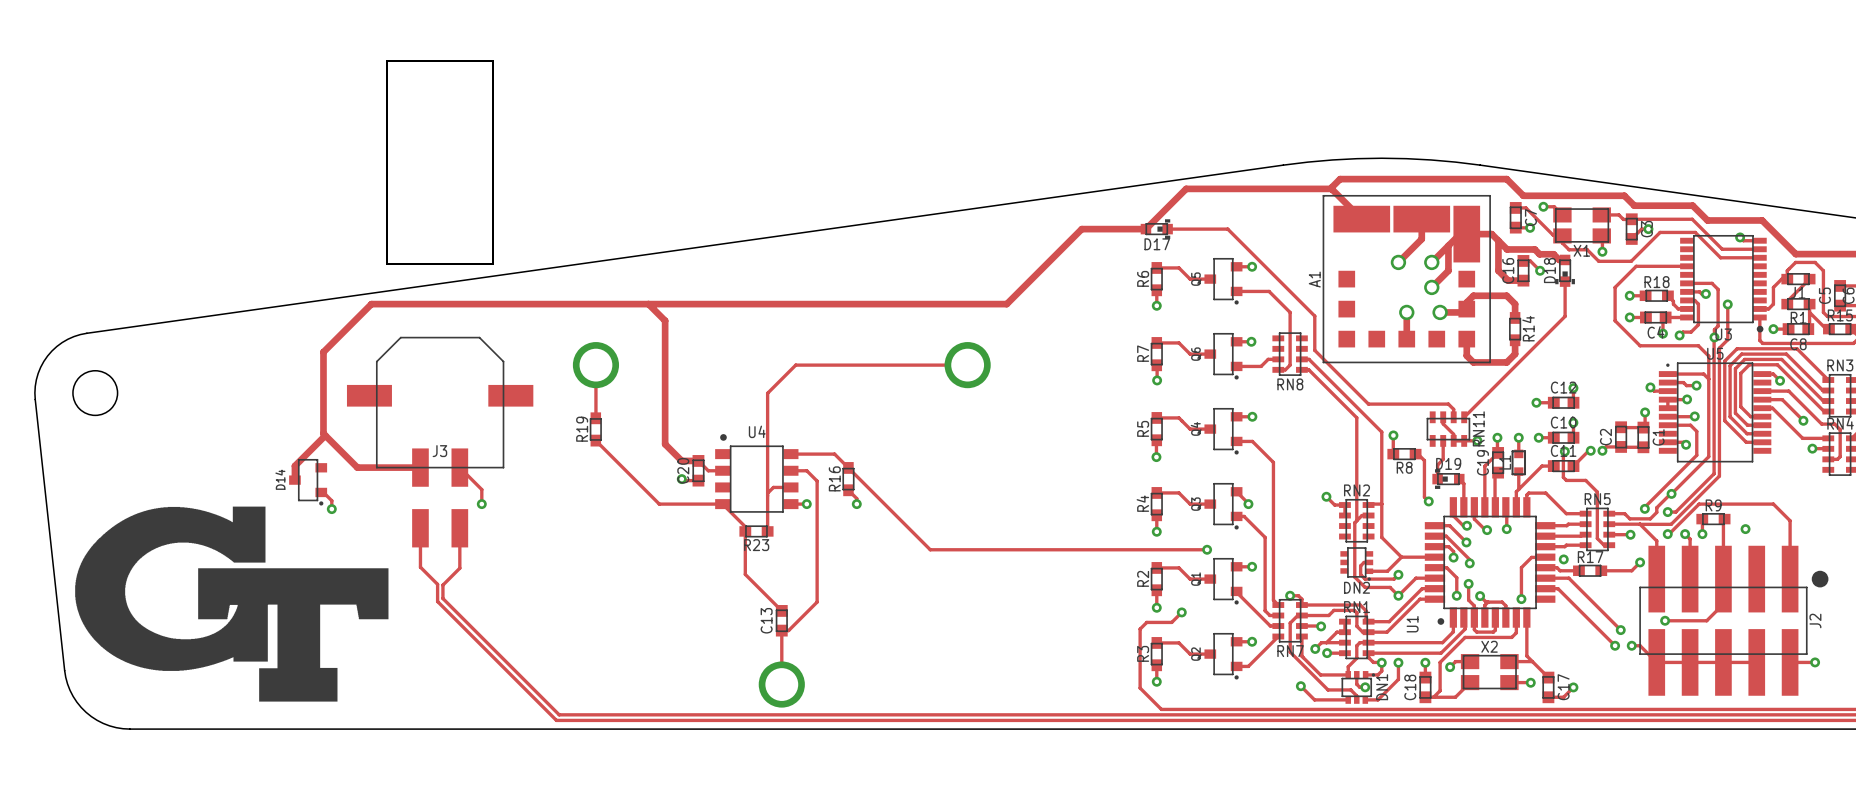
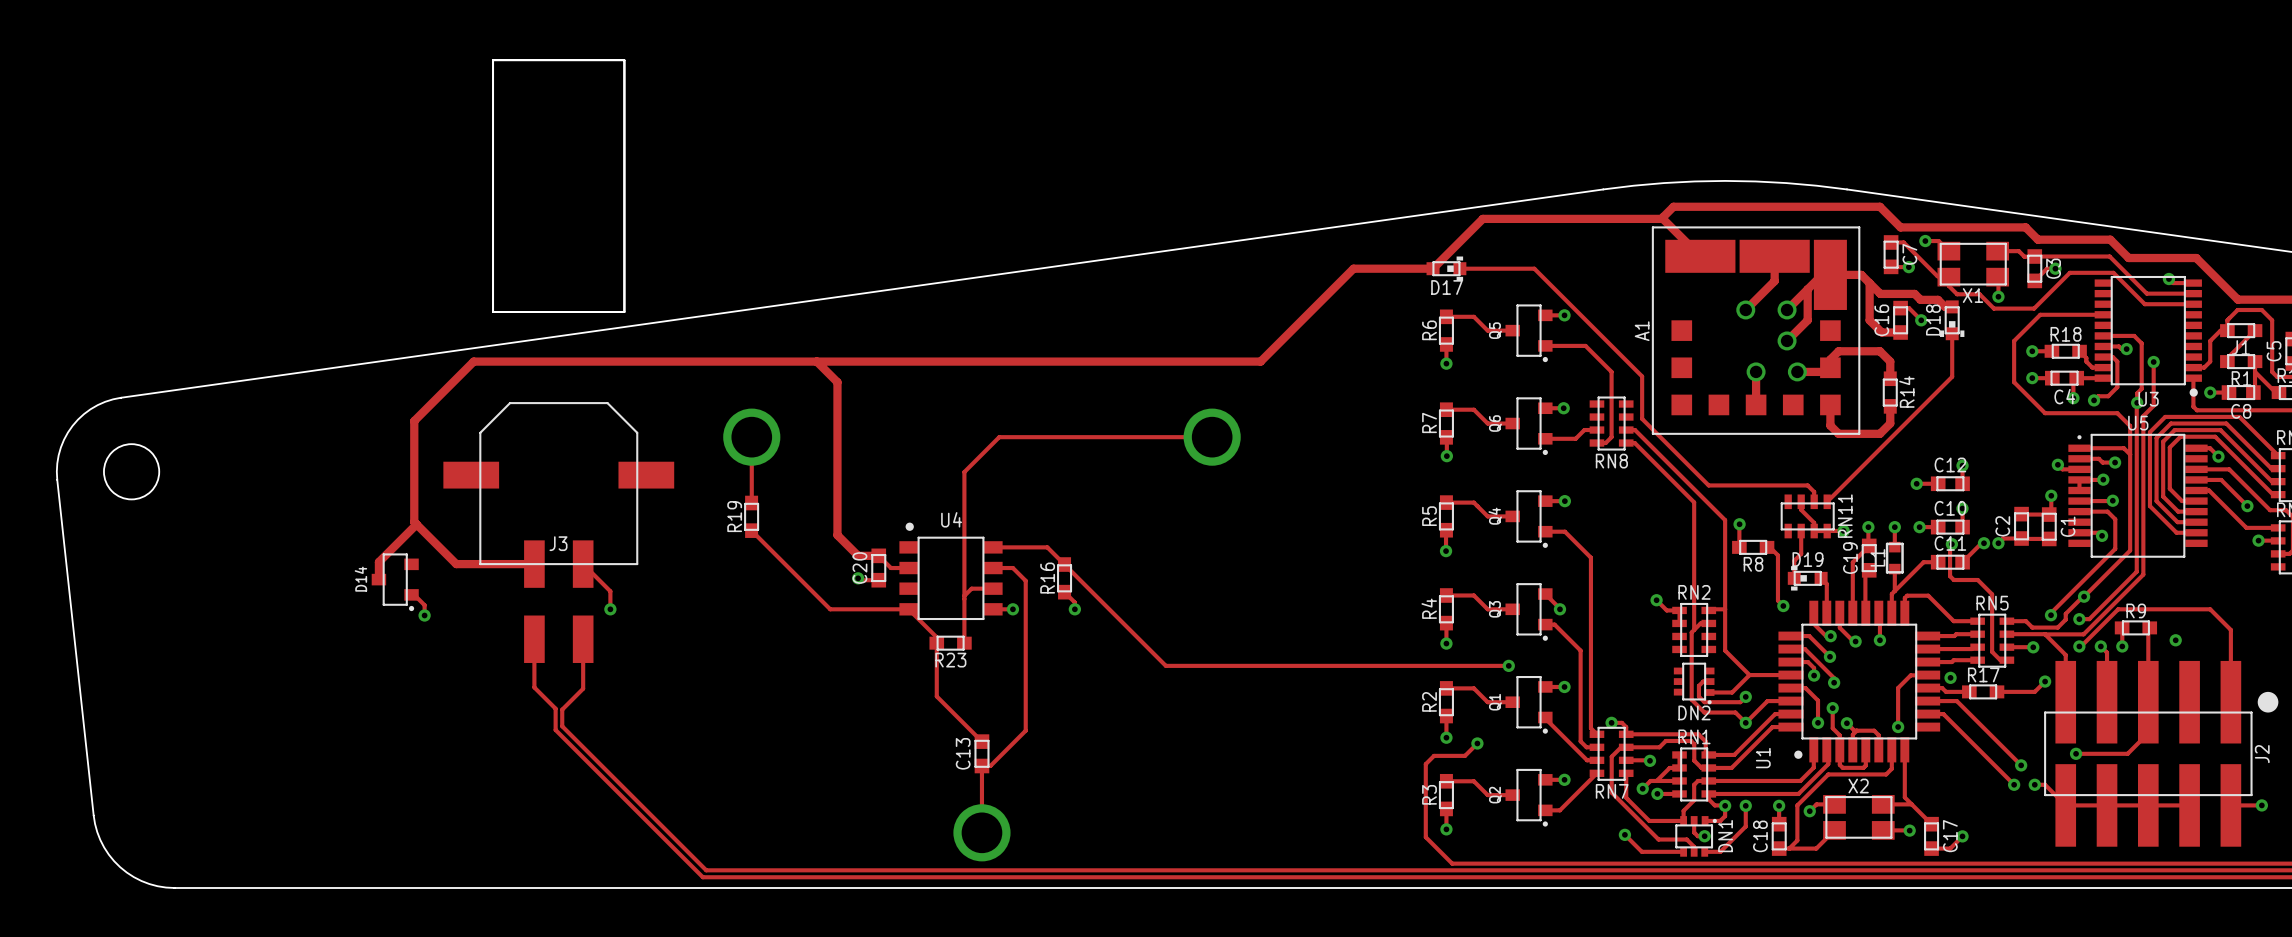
drawing: [75, 506, 389, 702] -> none

